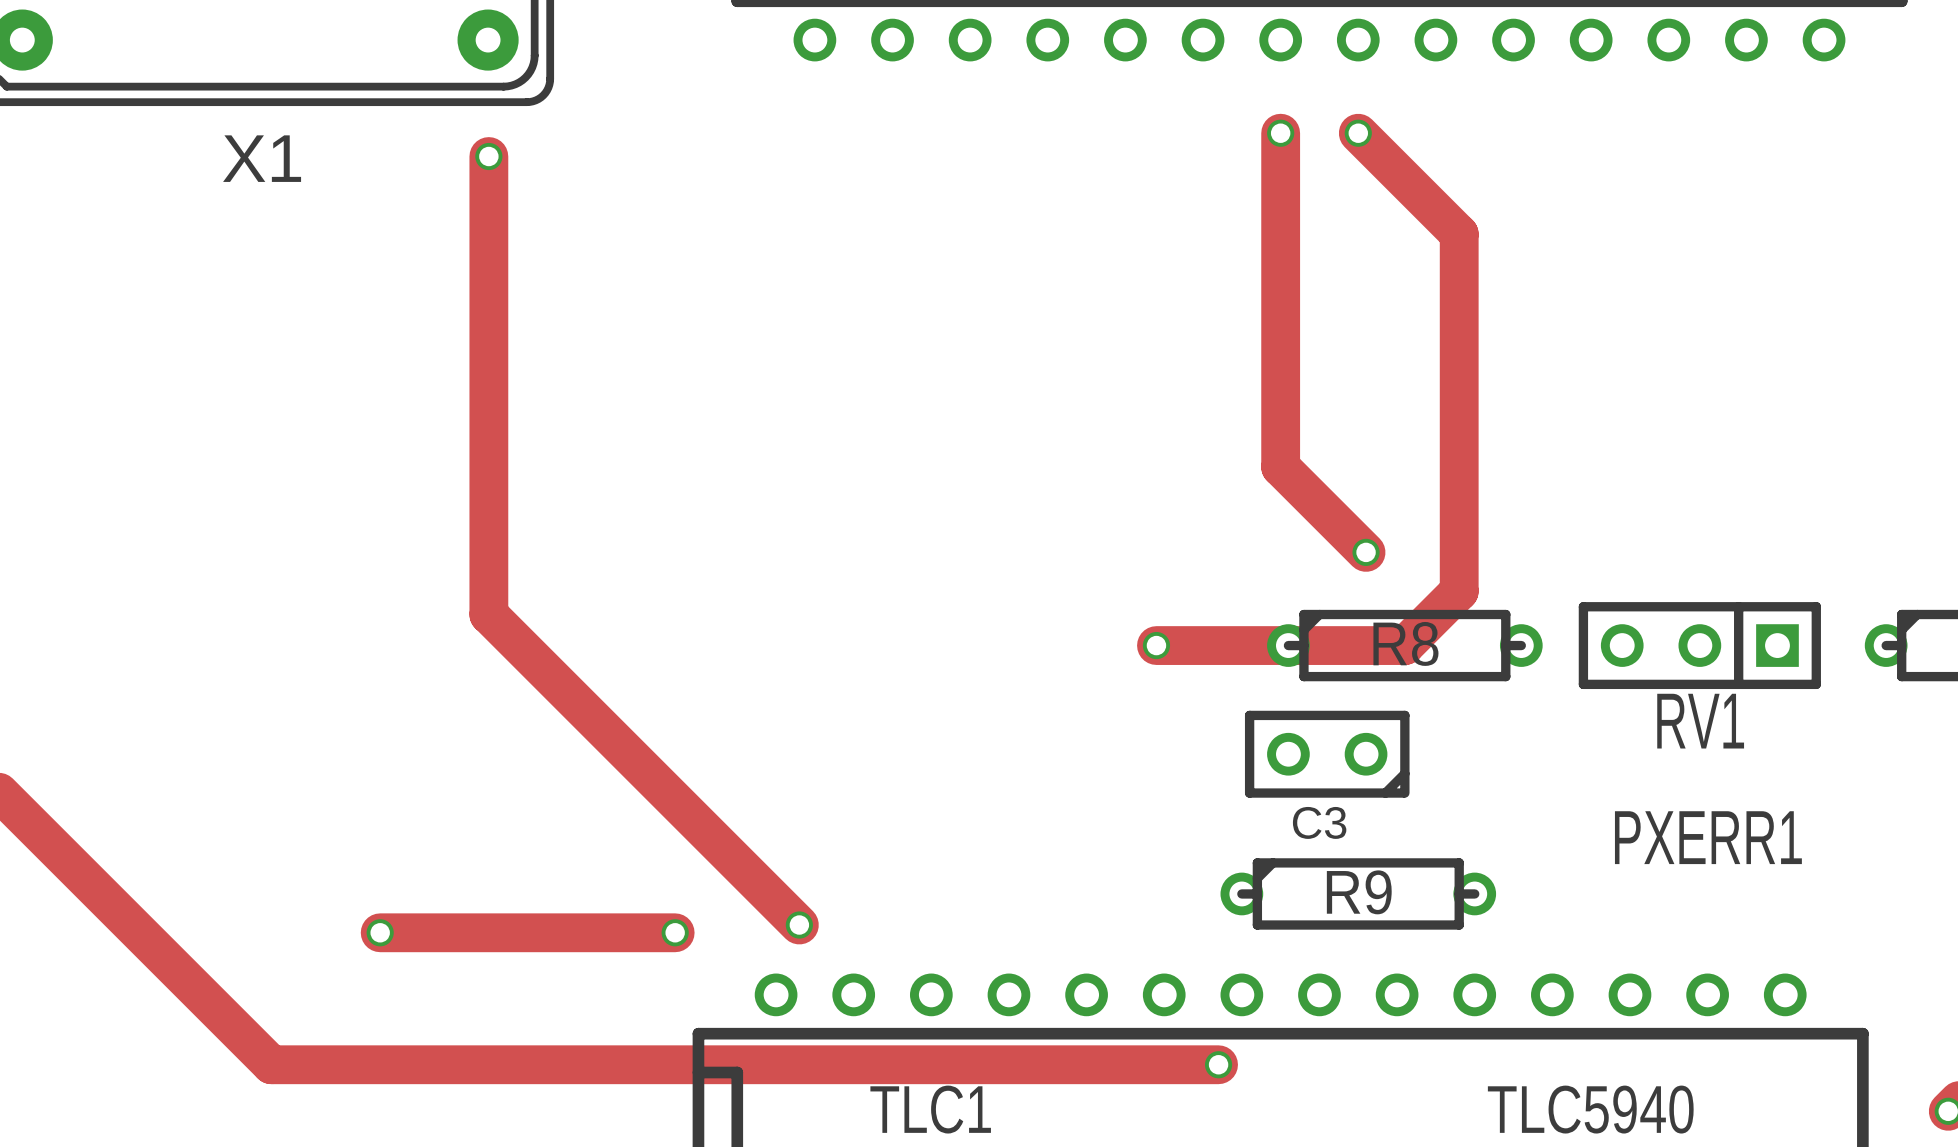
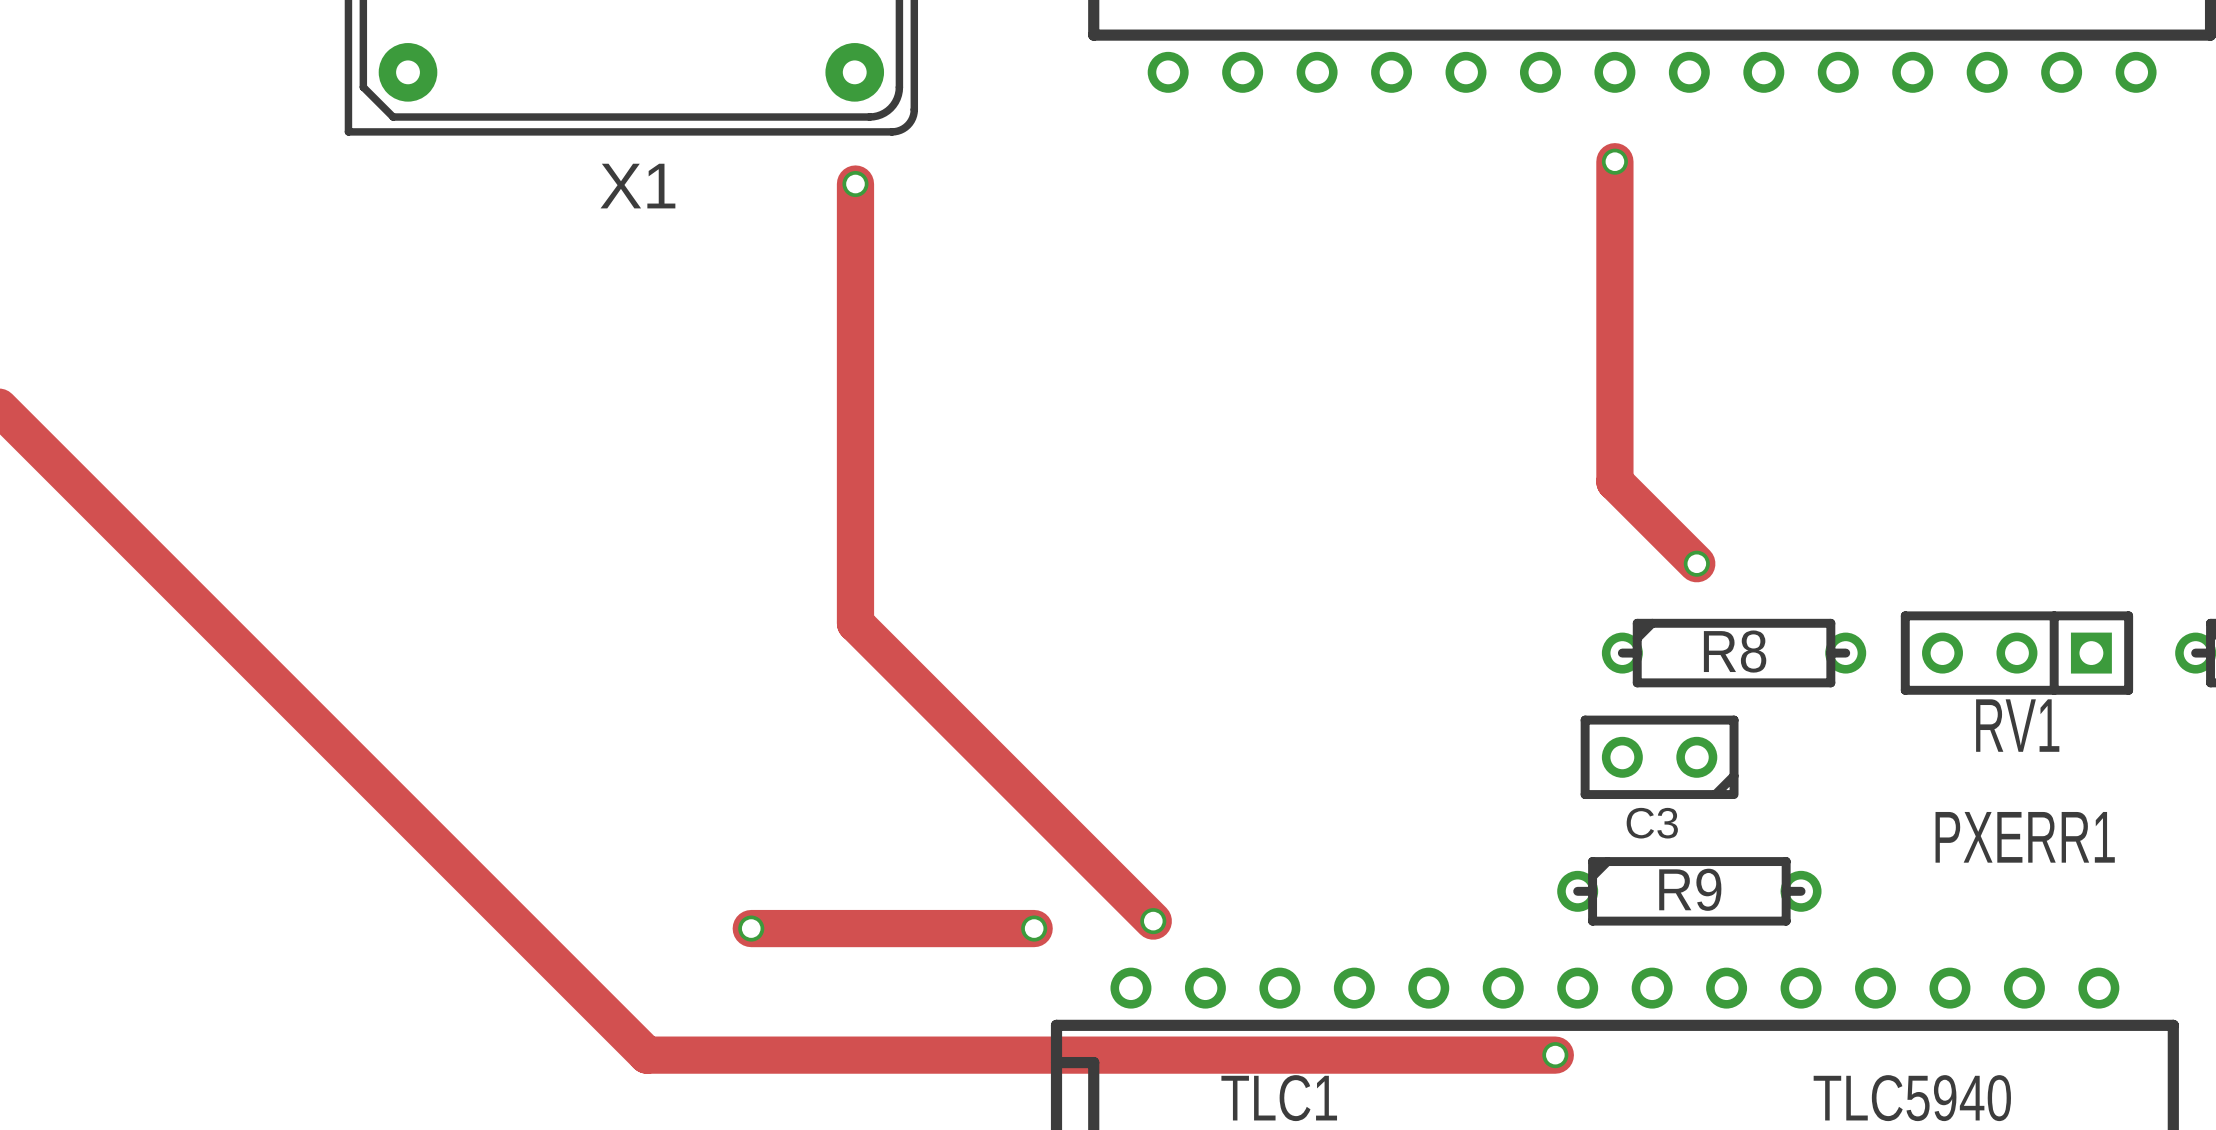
track: (1358, 133) (1459, 234) (1459, 591) (1404, 645) (1156, 645) -> none
via: (1358, 133) -> none
via: (1156, 645) -> none

